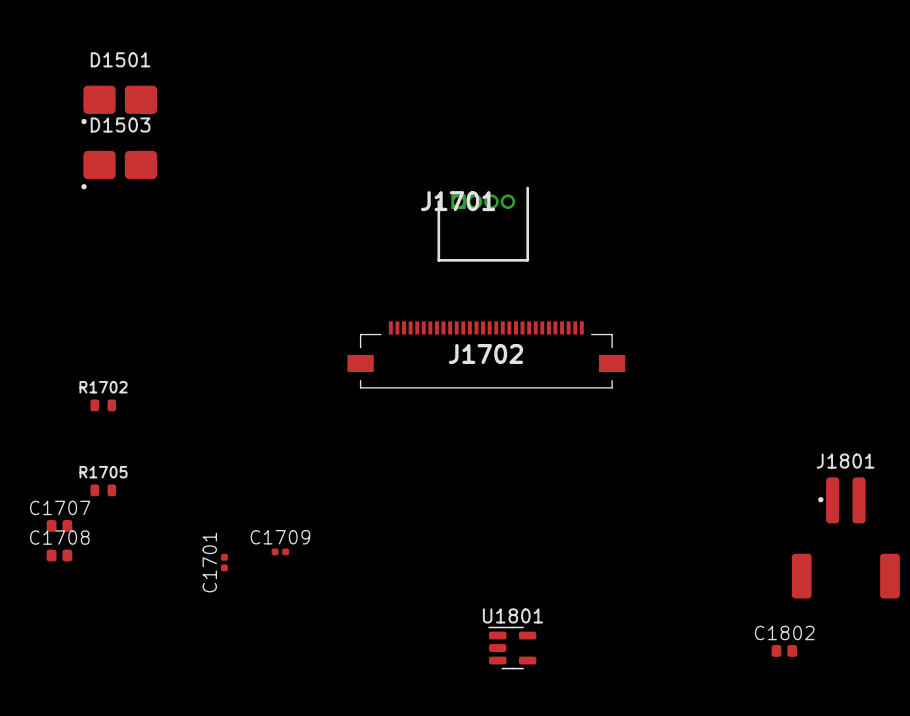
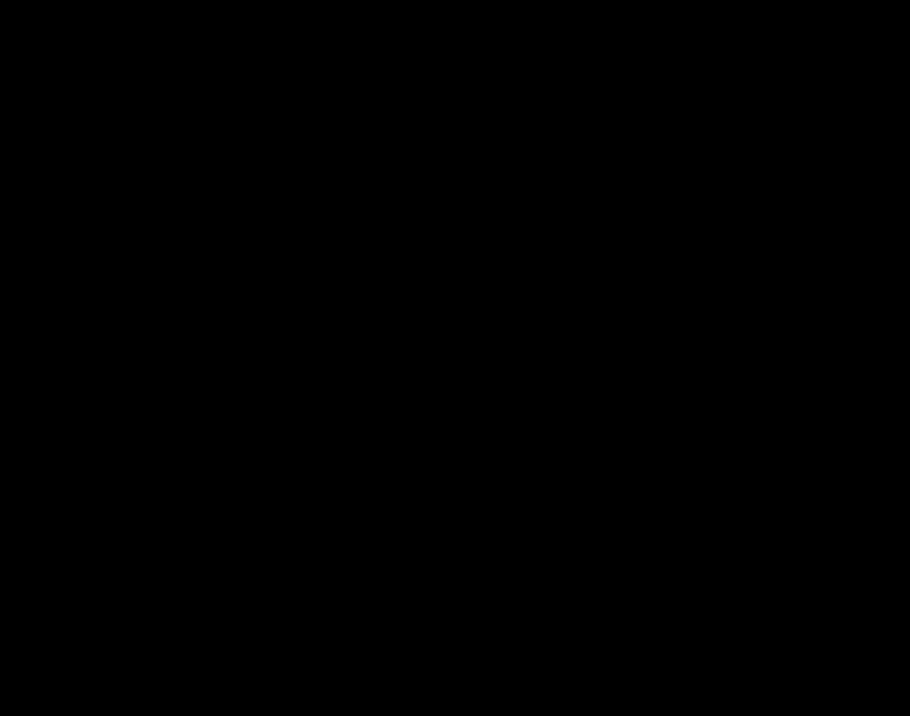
D1501: (119, 104) -> none
D1503: (119, 170) -> none
J1701: (483, 224) -> none
J1702: (486, 354) -> none
R1702: (103, 405) -> none
R1705: (103, 490) -> none
C1707: (59, 525) -> none
J1801: (845, 537) -> none
C1709: (280, 551) -> none
C1708: (59, 555) -> none
C1701: (224, 562) -> none
U1801: (512, 648) -> none
C1802: (784, 650) -> none

